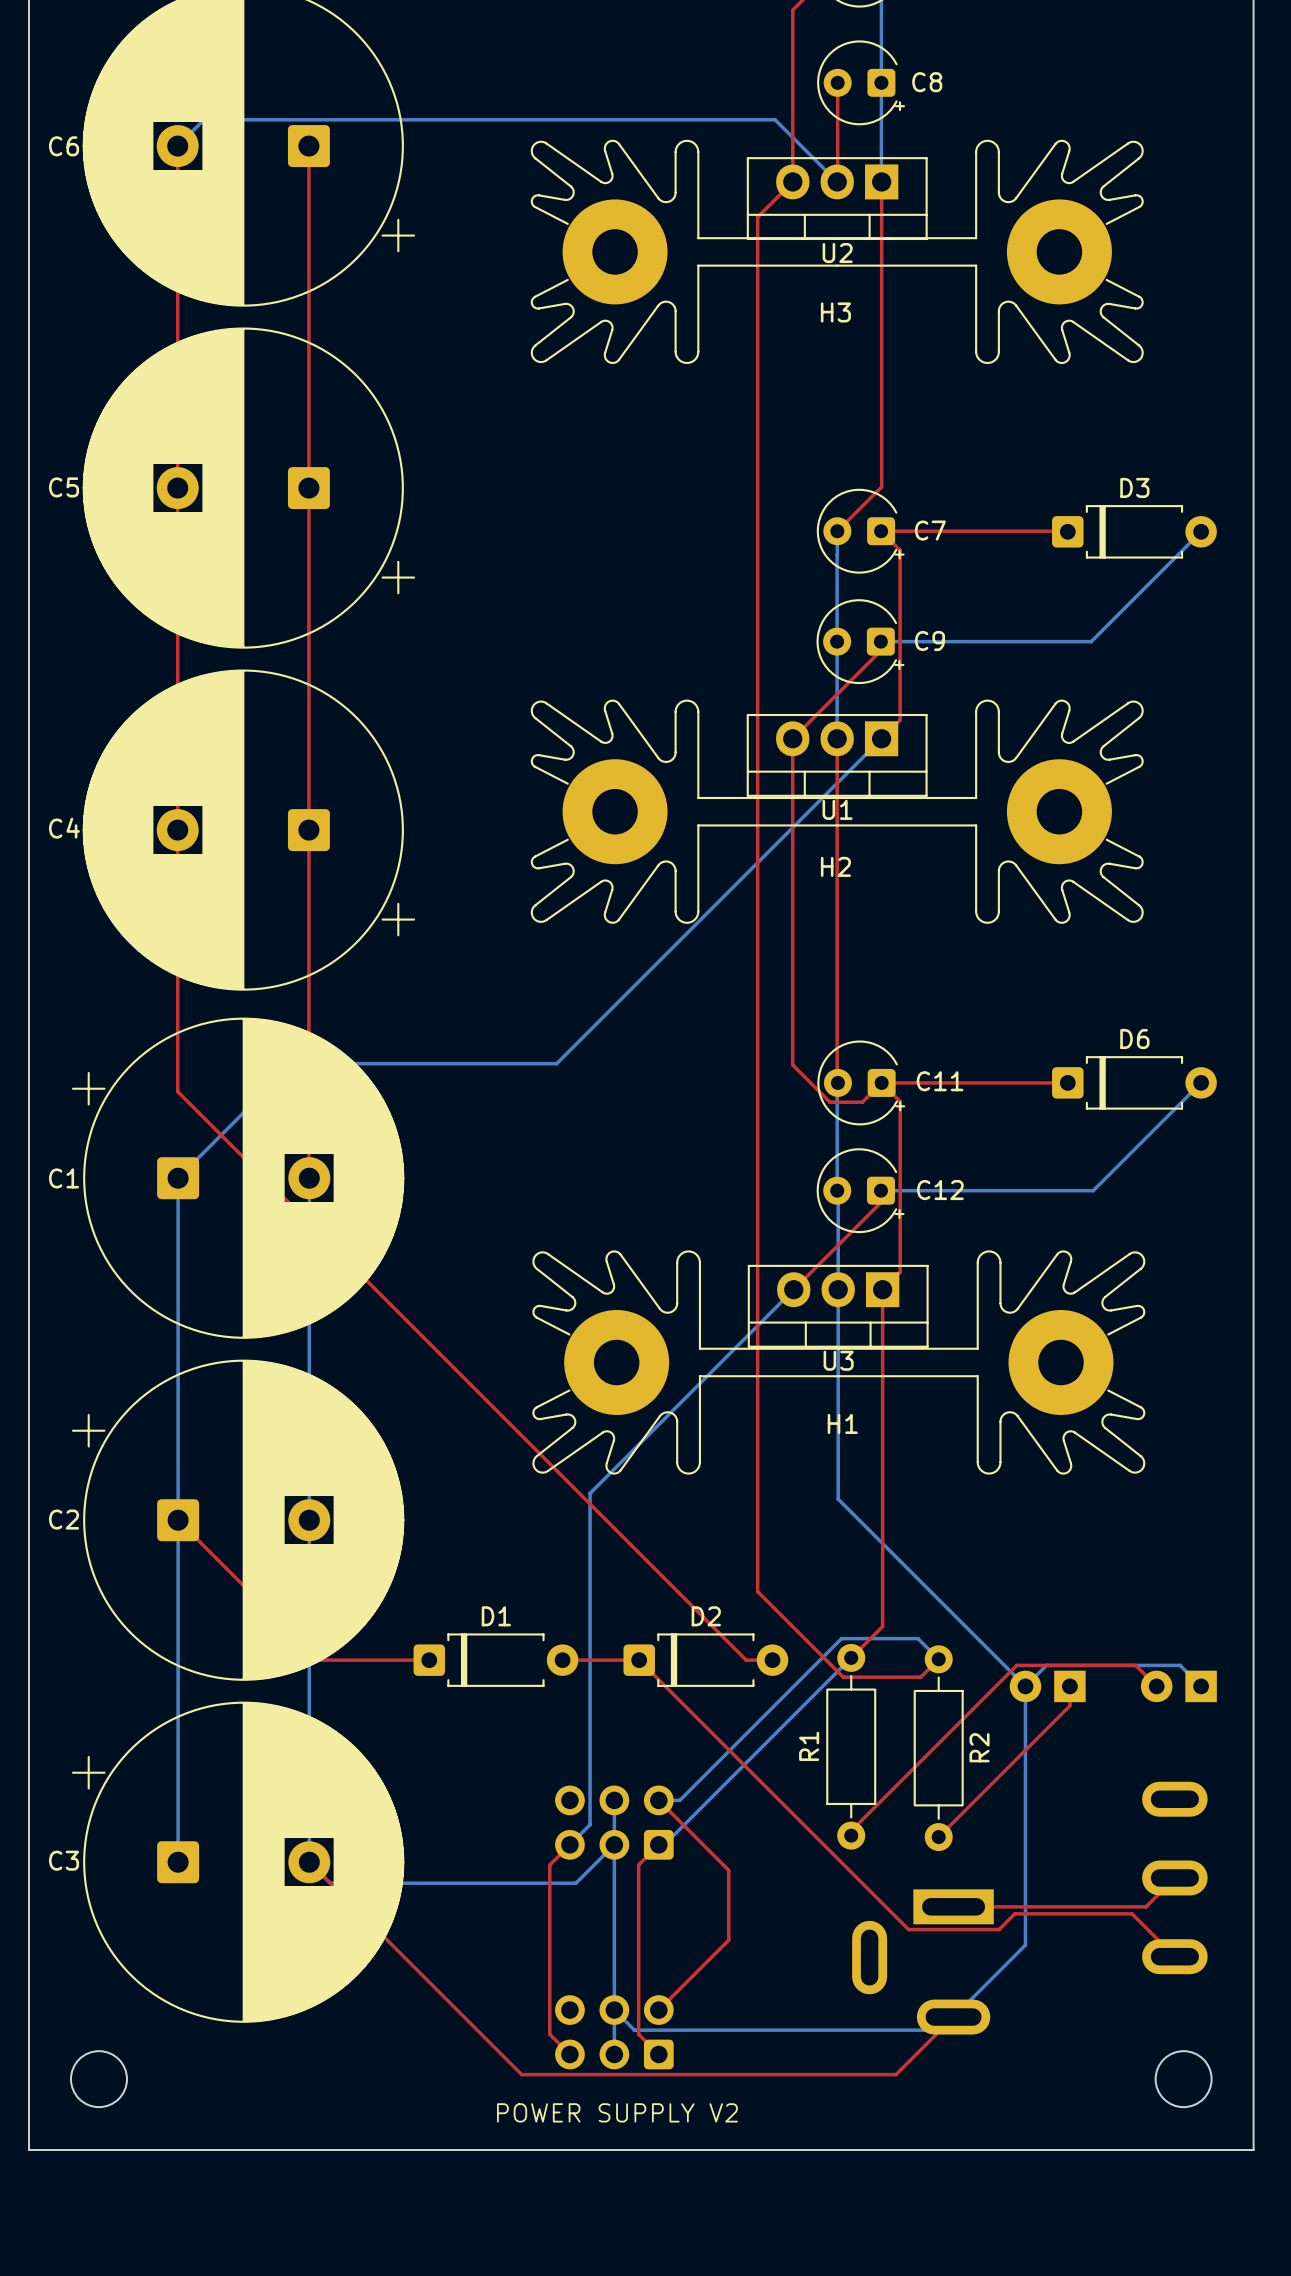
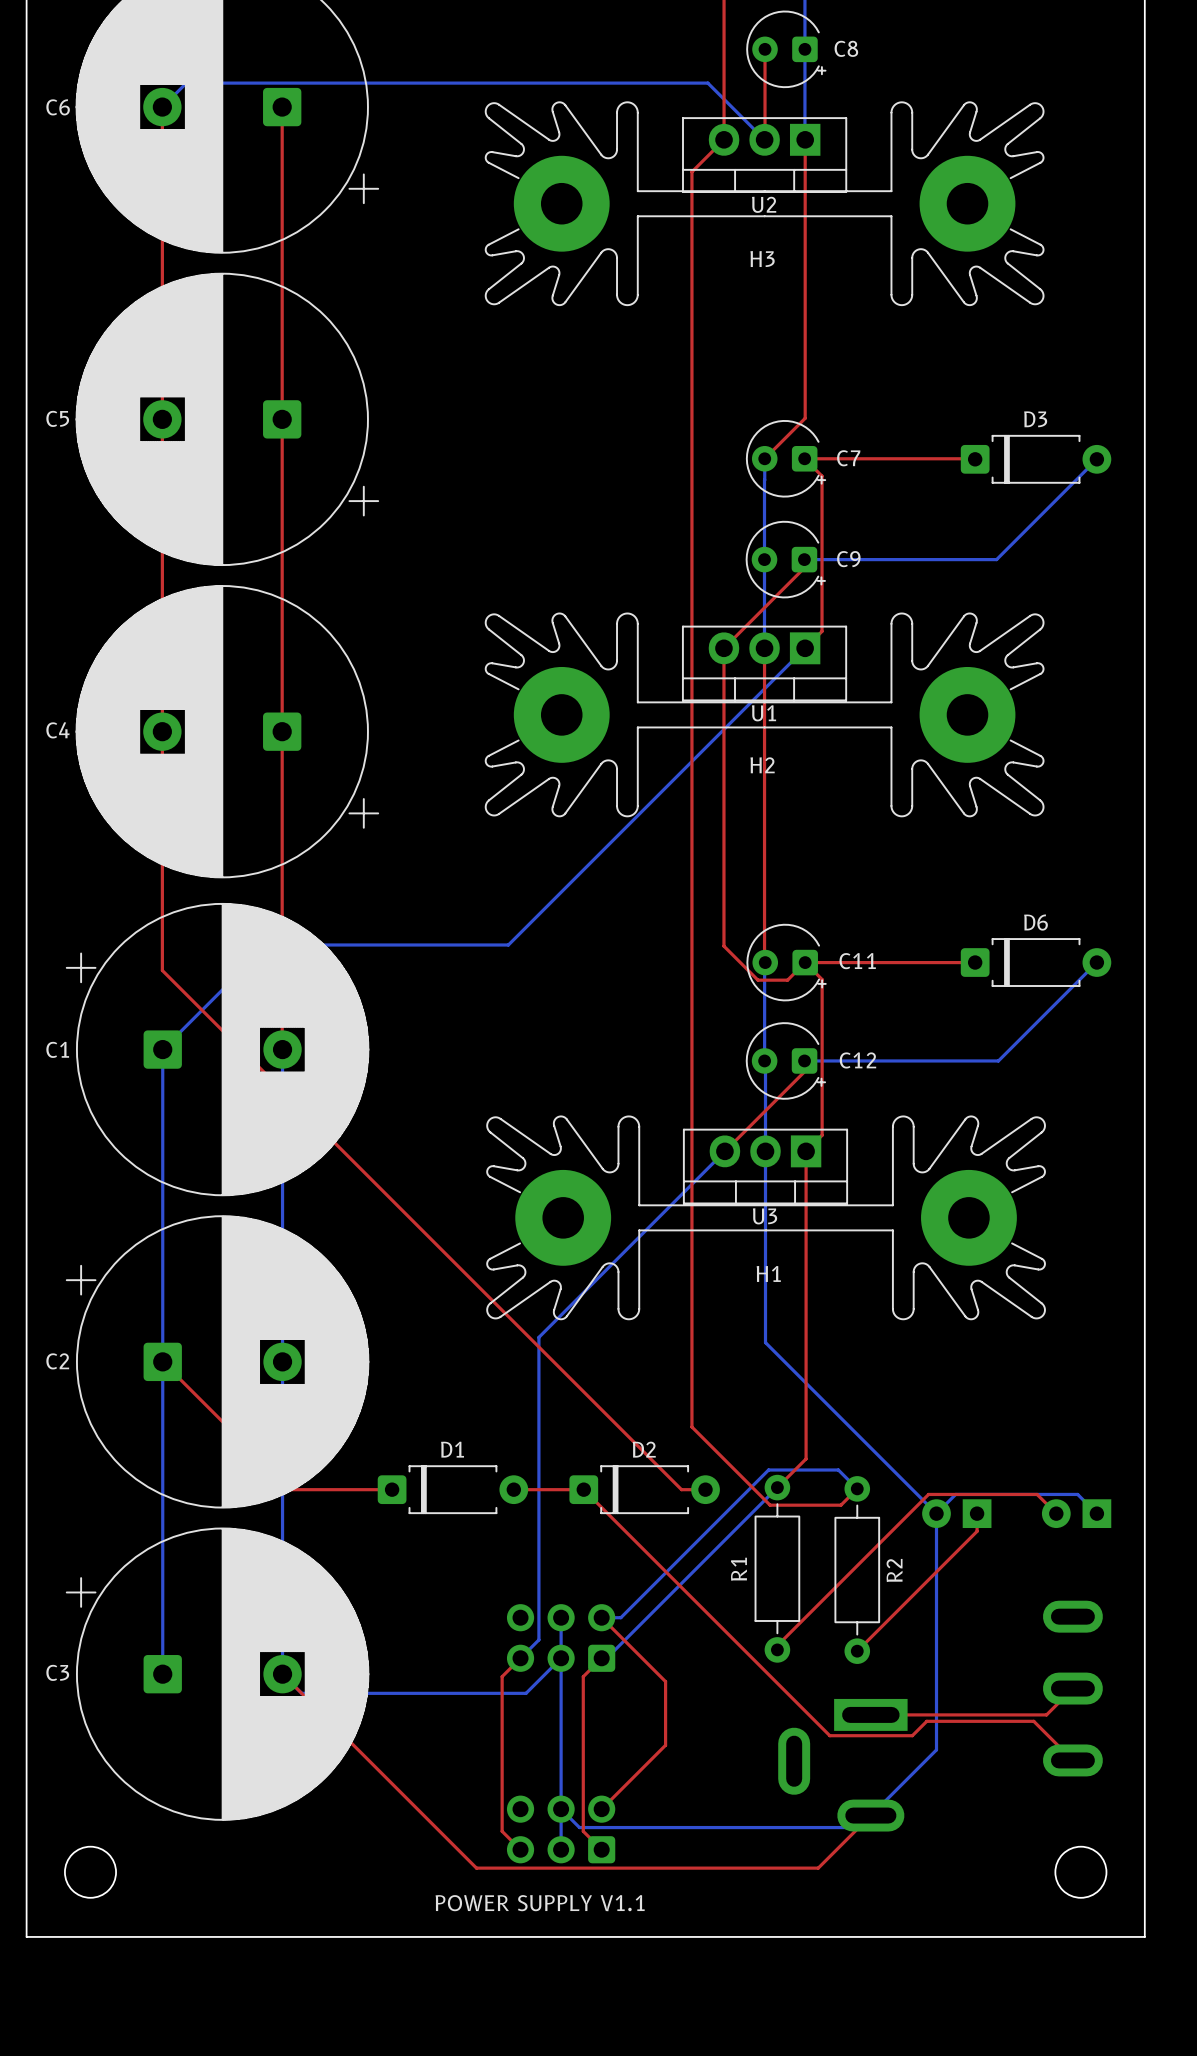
text: POWER SUPPLY V2 (617, 2112) -> POWER SUPPLY V1.1 (540, 1903)

